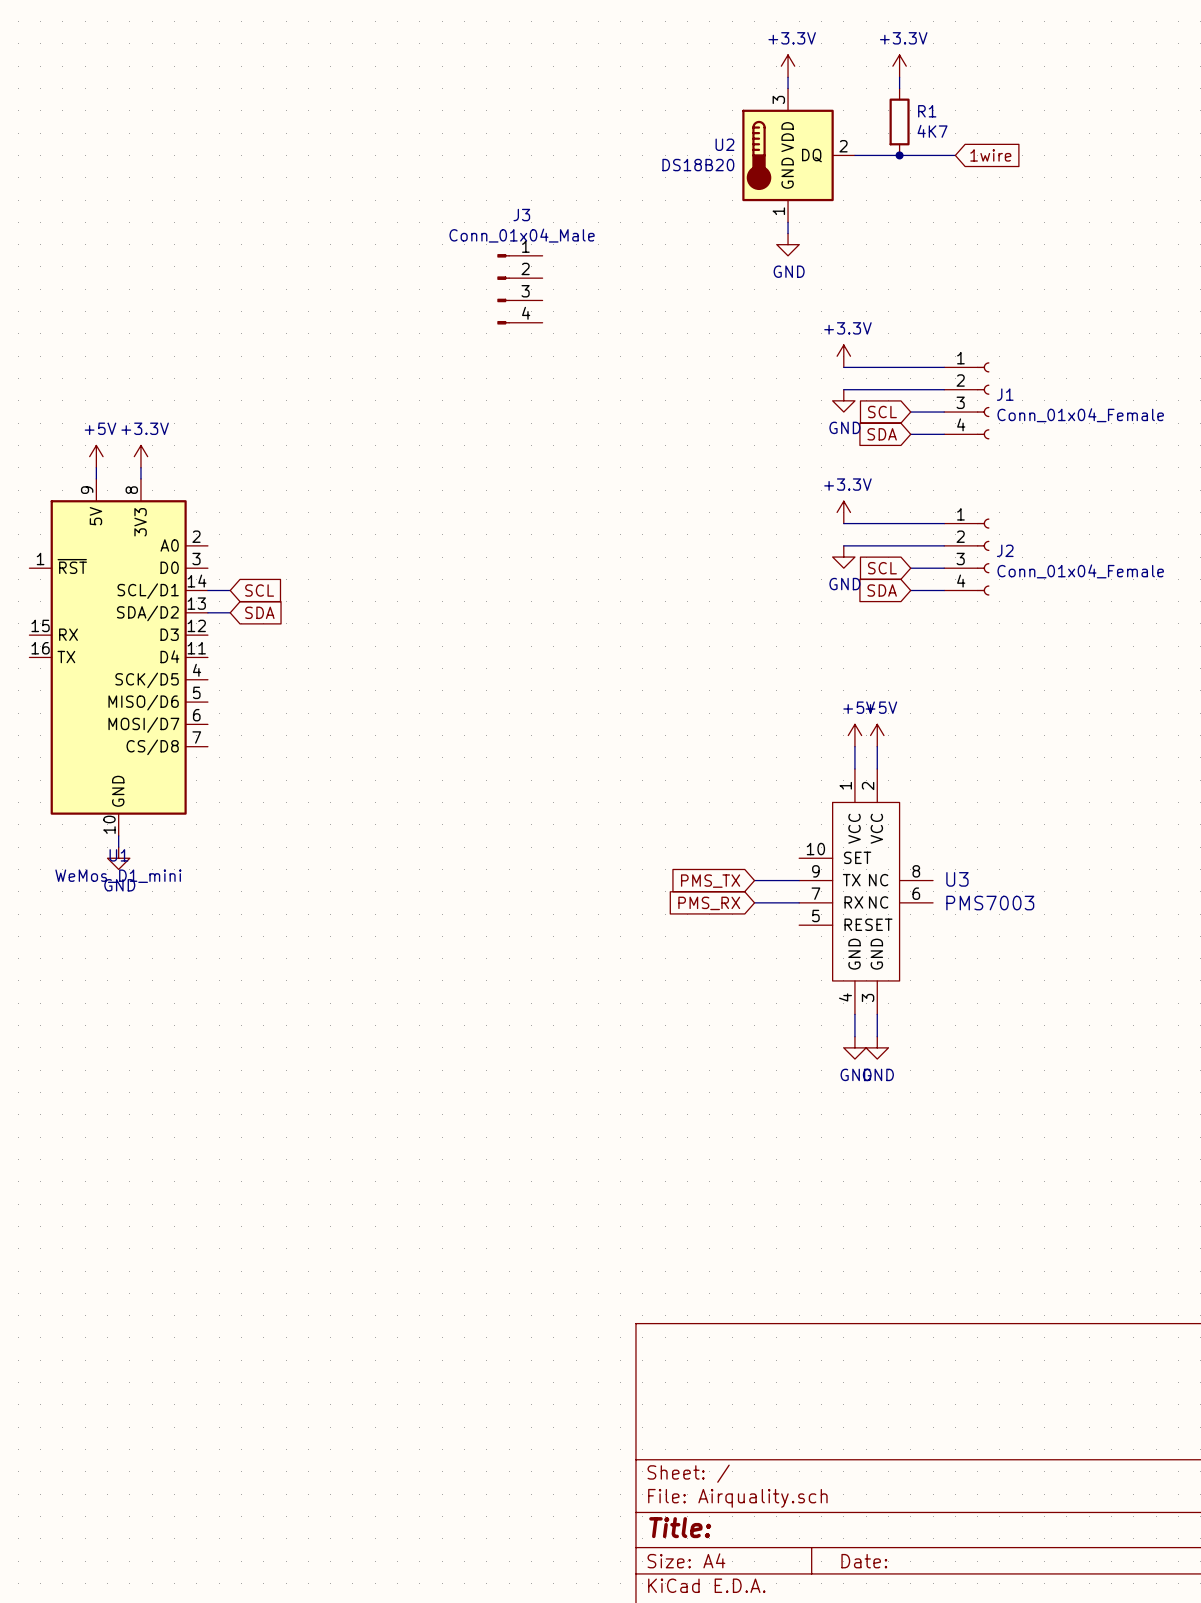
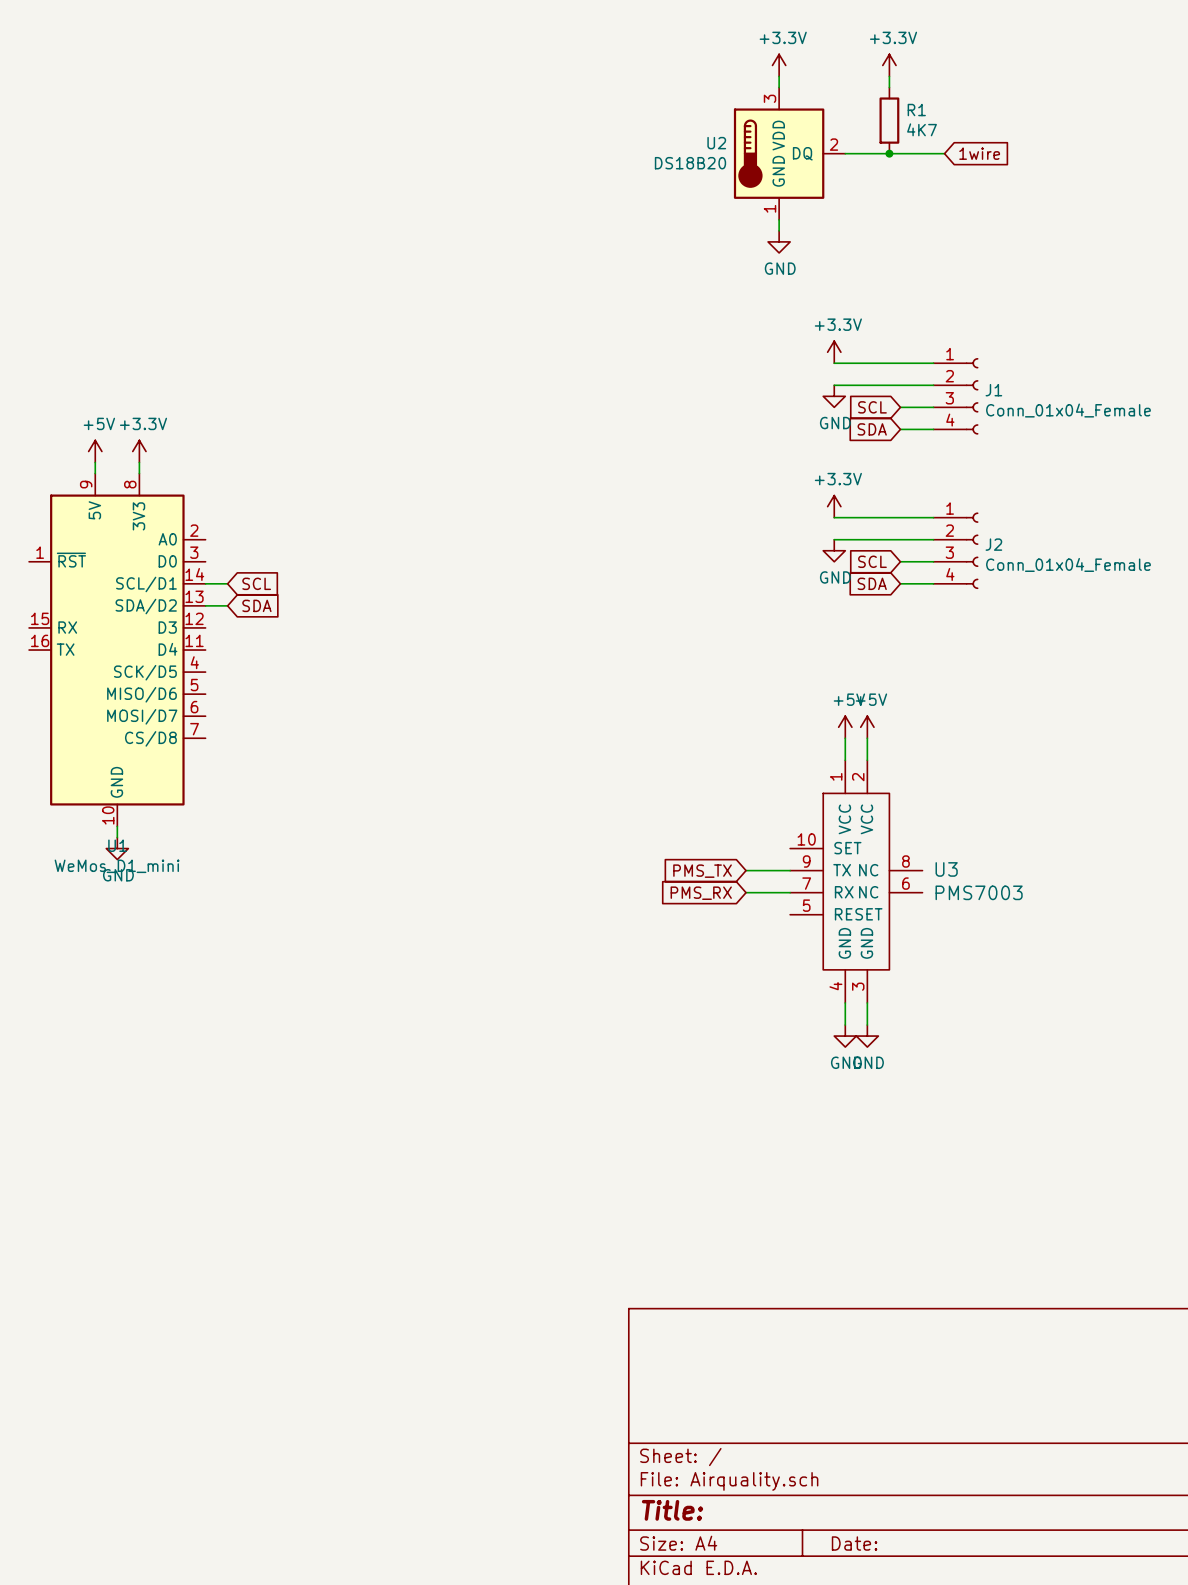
J3: Conn_01x04_Male (519, 289) -> none

